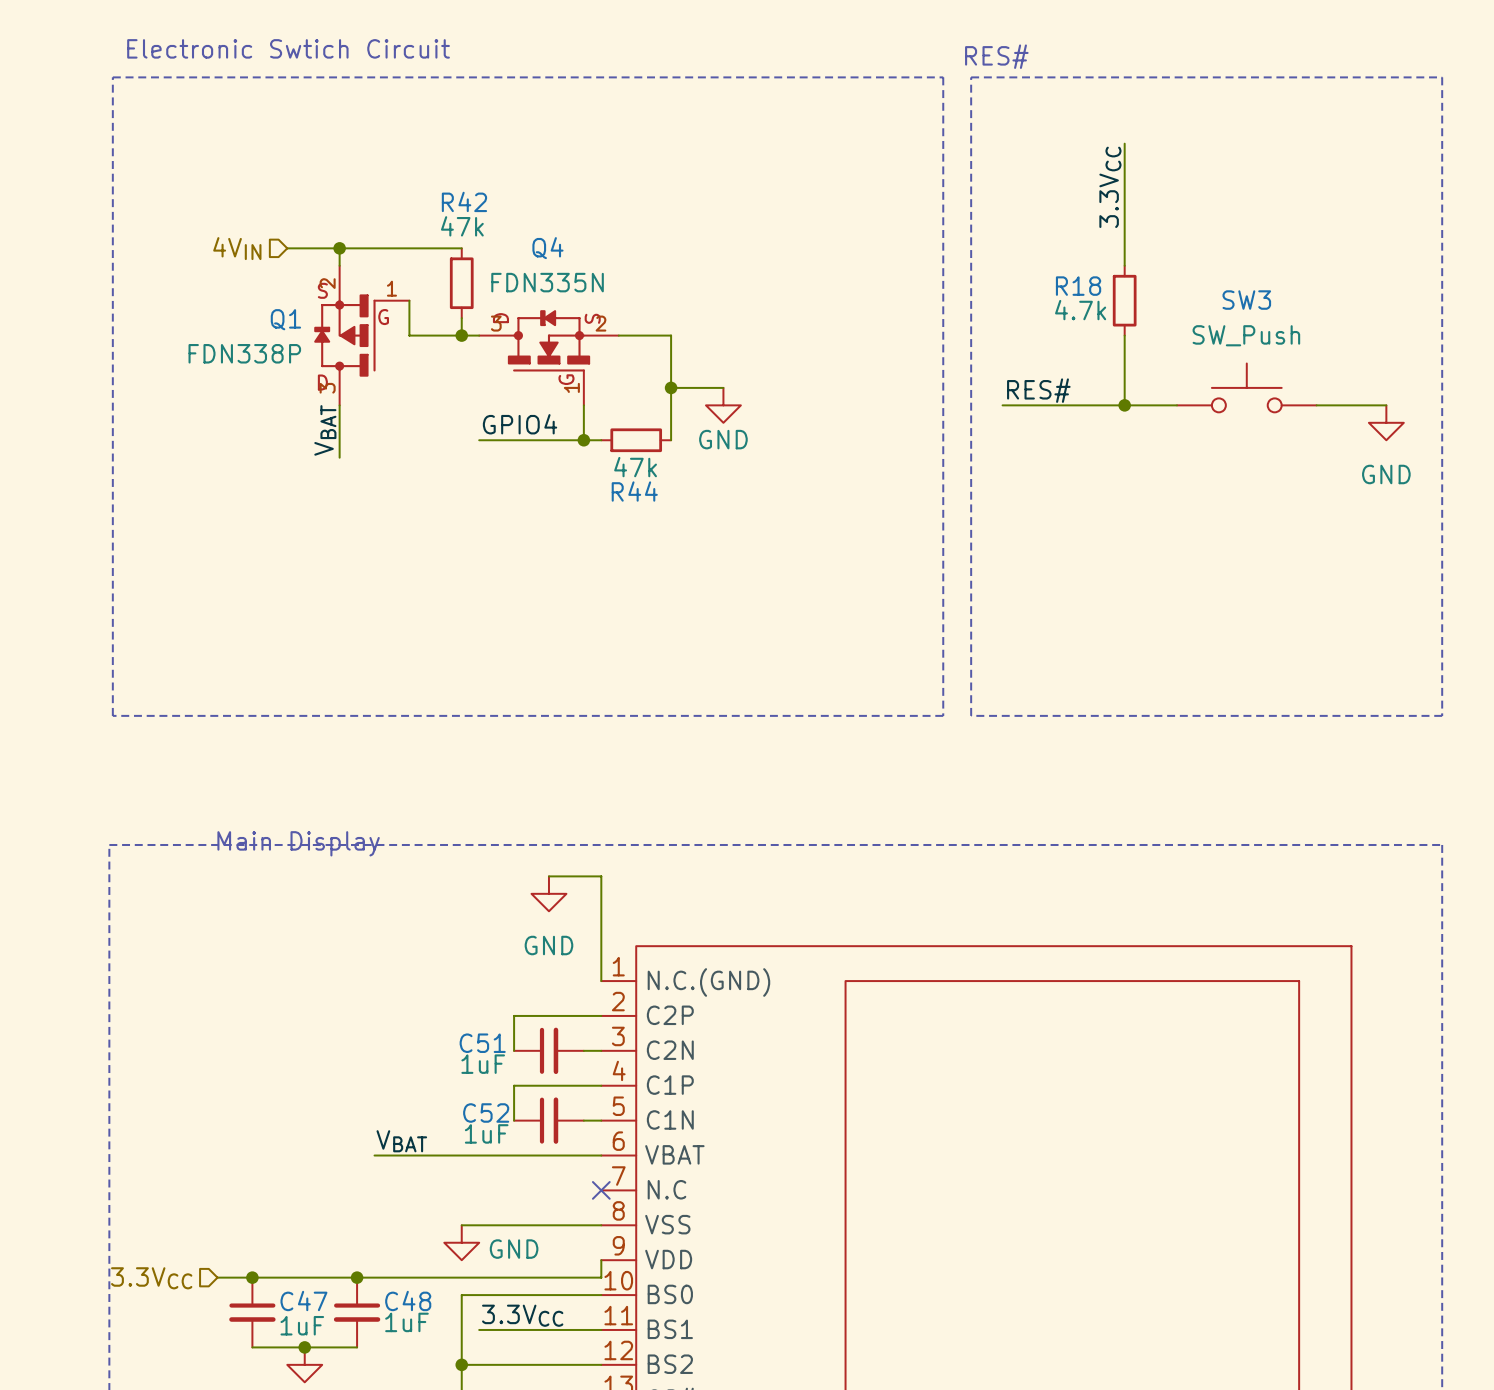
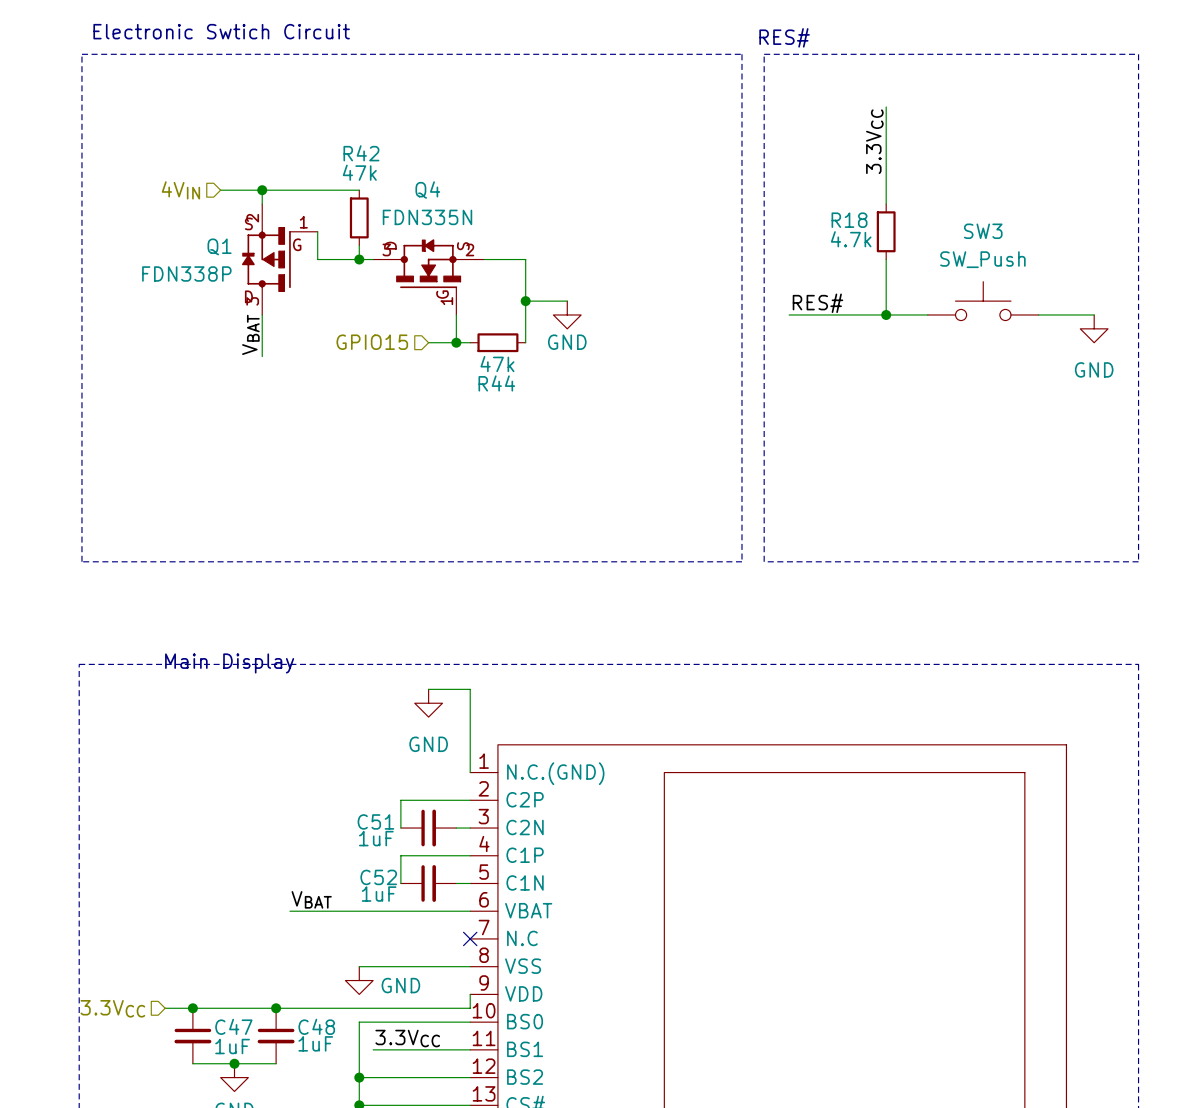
label: GPIO4 (520, 424) -> none
hierarchical label: none -> GPIO15 (372, 342)
wire: (479, 440) (548, 440) -> none

